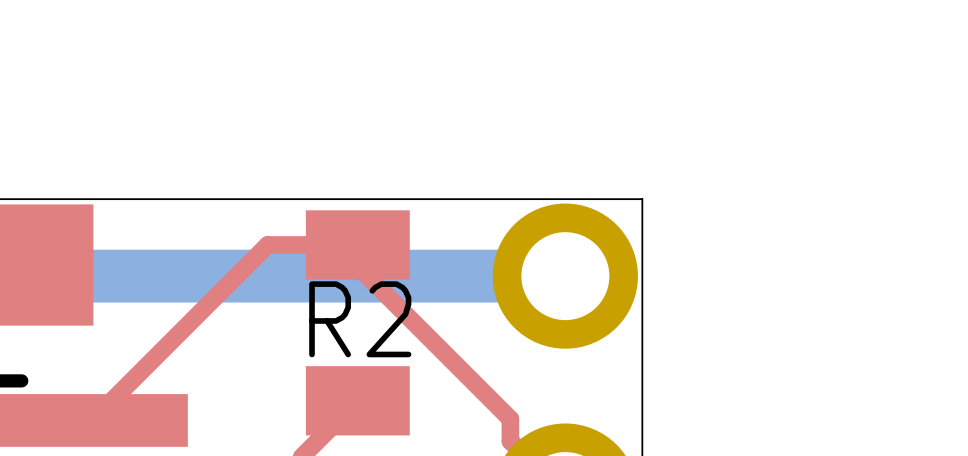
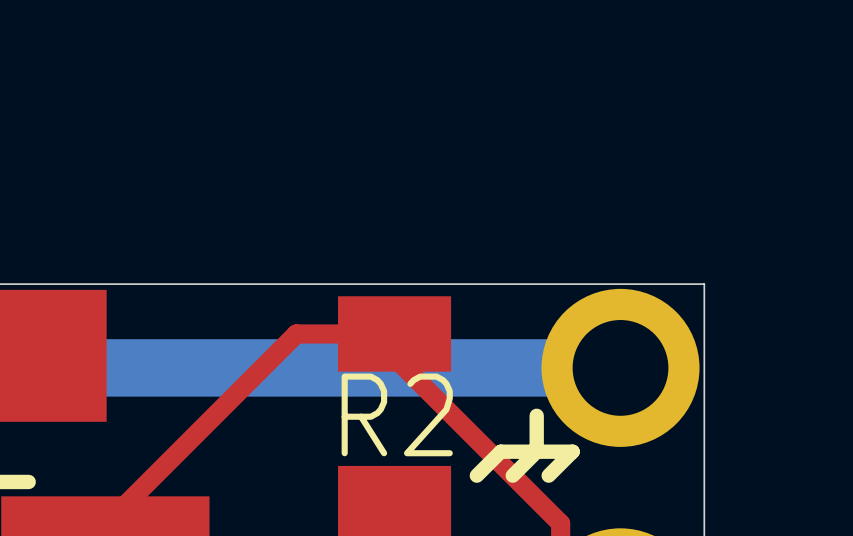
line: none -> (536, 415) (536, 451) (512, 475)
line: none -> (476, 475) (500, 451) (572, 451) (548, 475)

